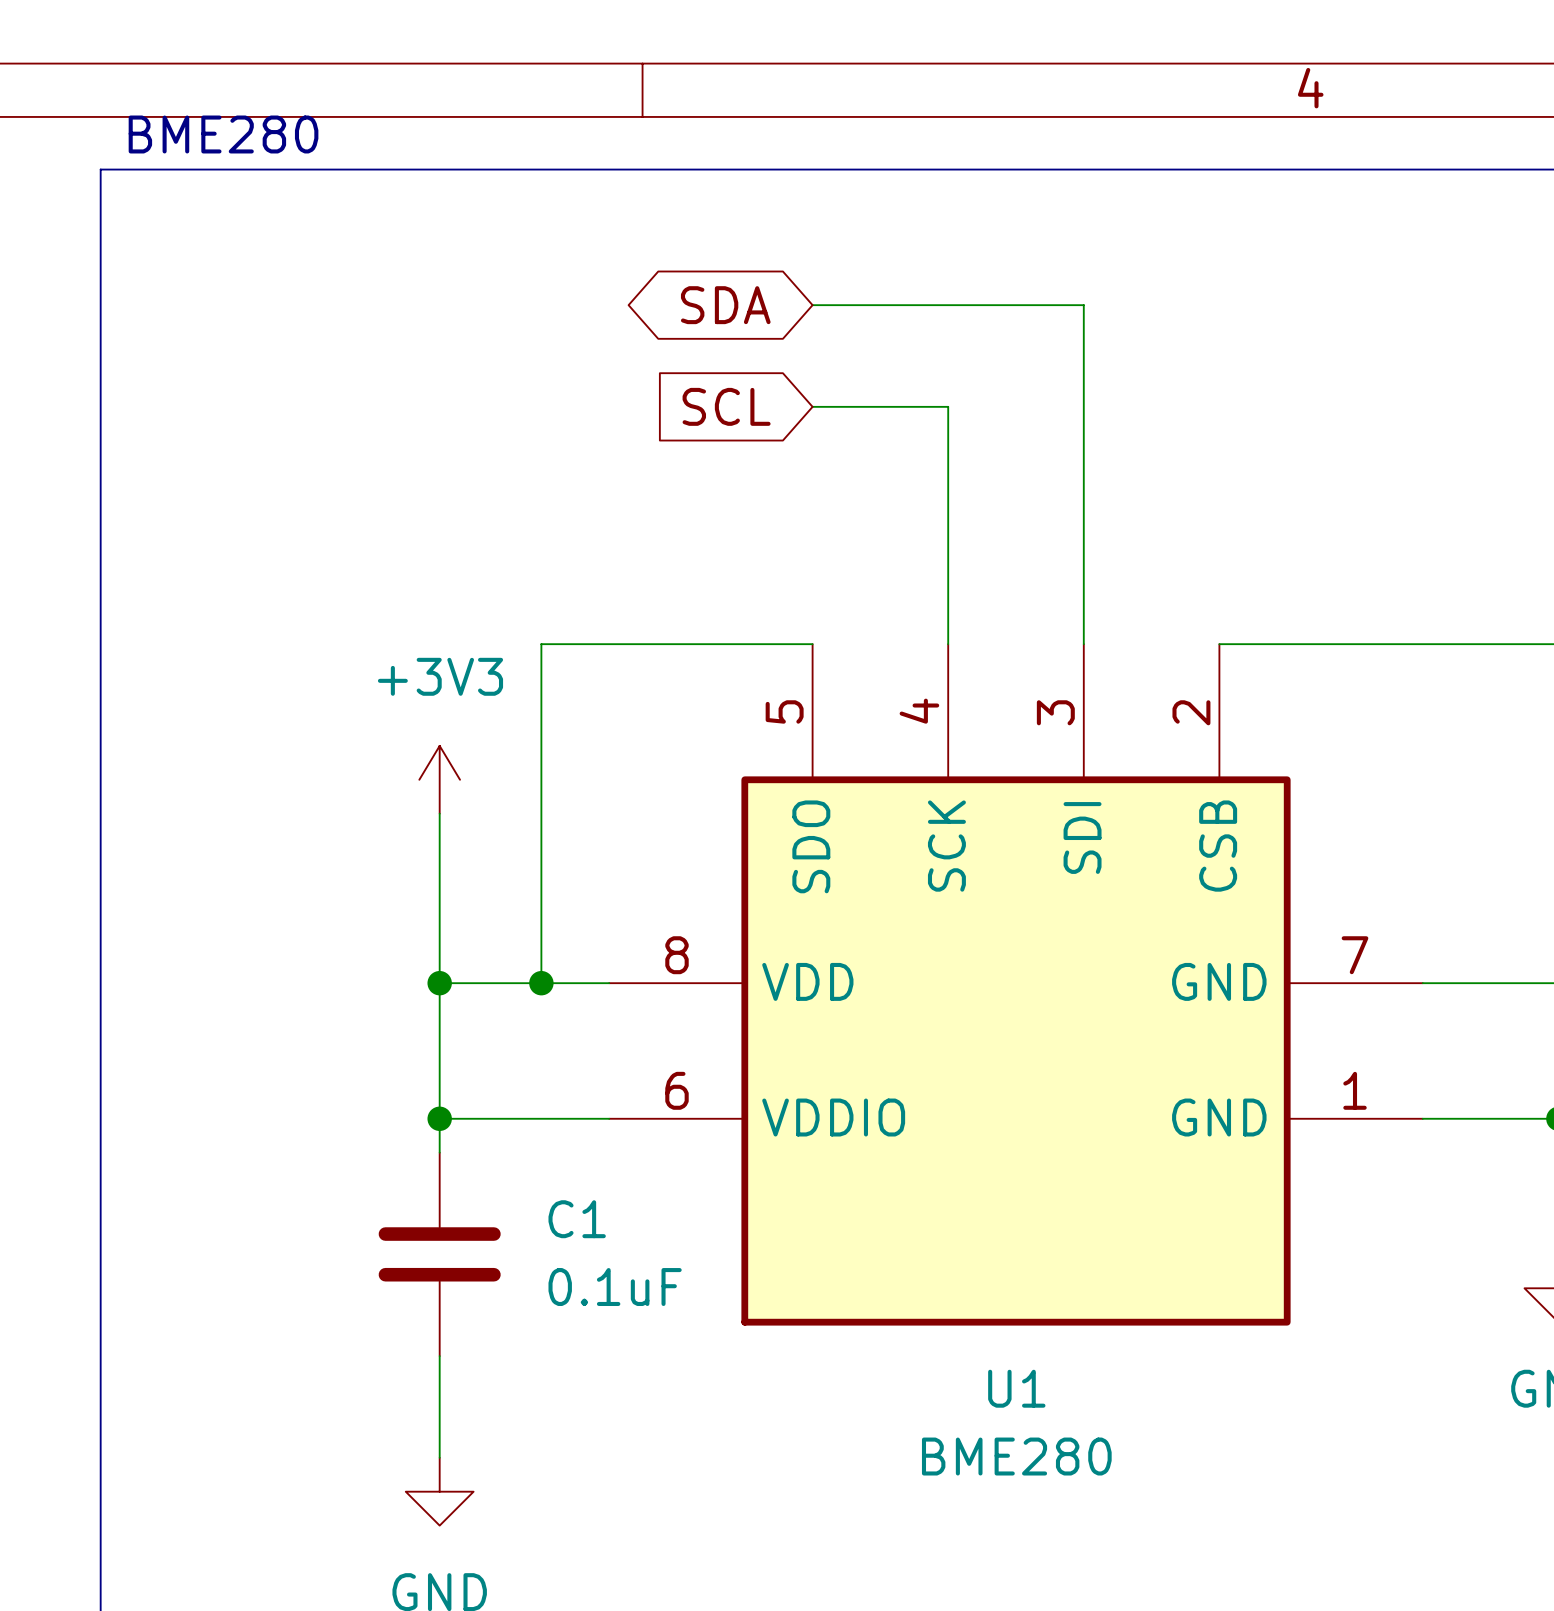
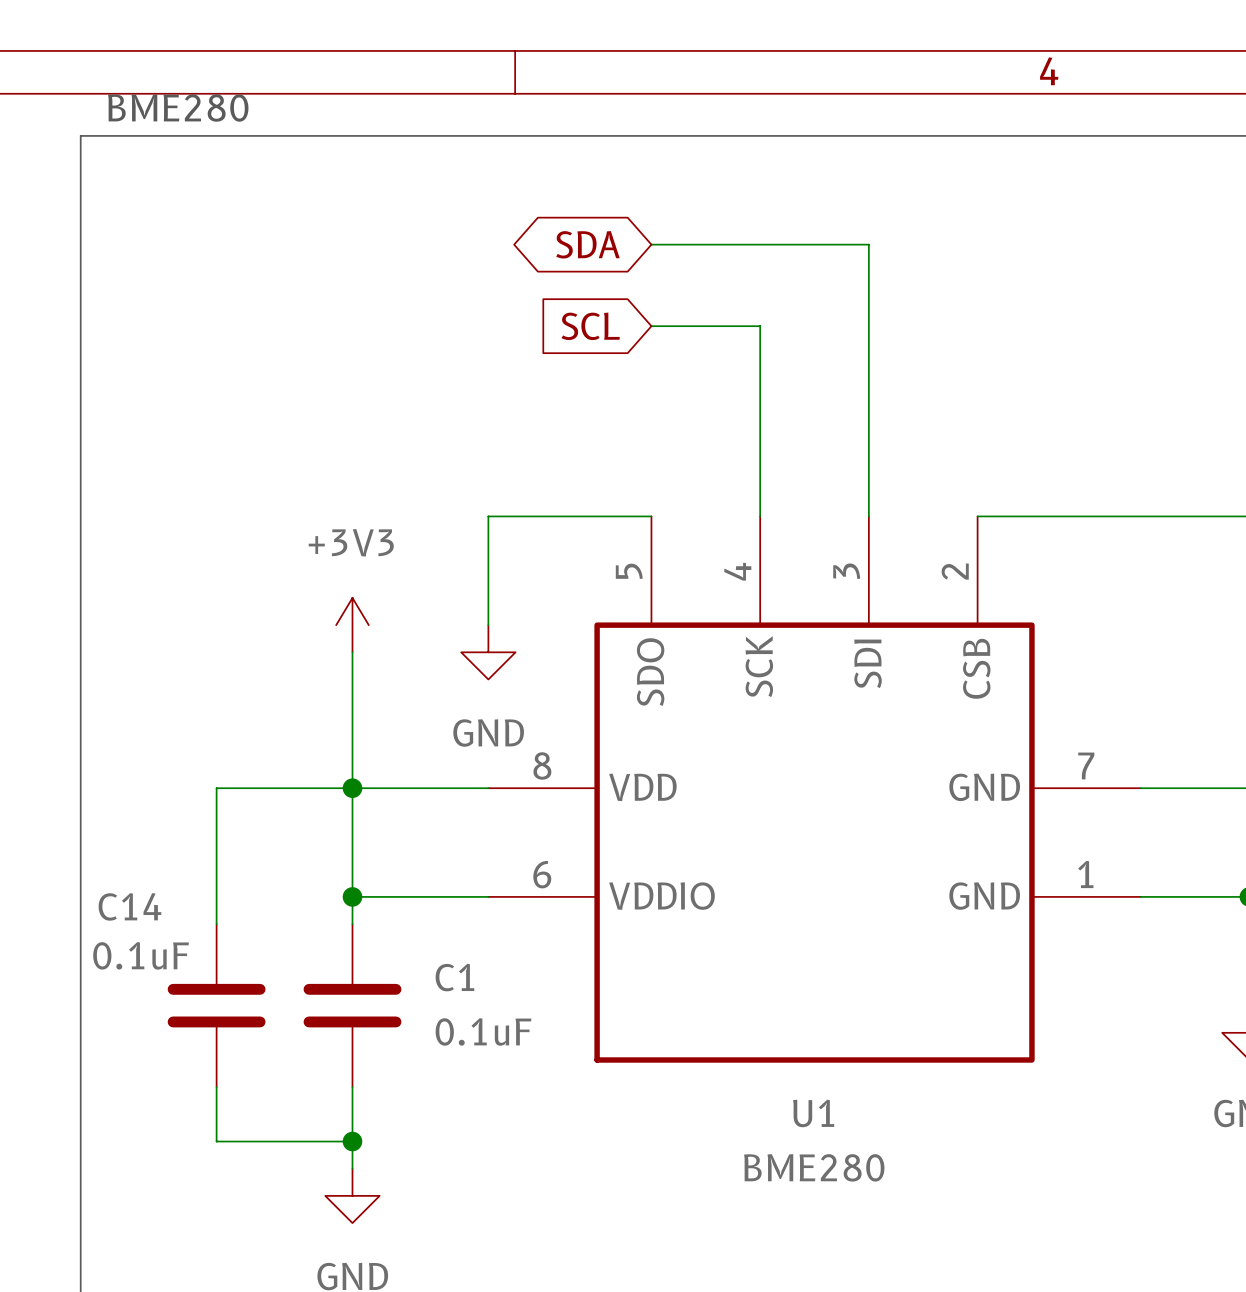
wire: (609, 644) (541, 644) (541, 983) -> (488, 516) (488, 625)
power symbol: none -> GND (488, 652)
wire: none -> (352, 788) (216, 788) (216, 924)
junction: (541, 983) -> none
C14: none -> 0.1uF (216, 1005)
wire: none -> (216, 1087) (216, 1141) (352, 1141)
junction: none -> (352, 1141)

